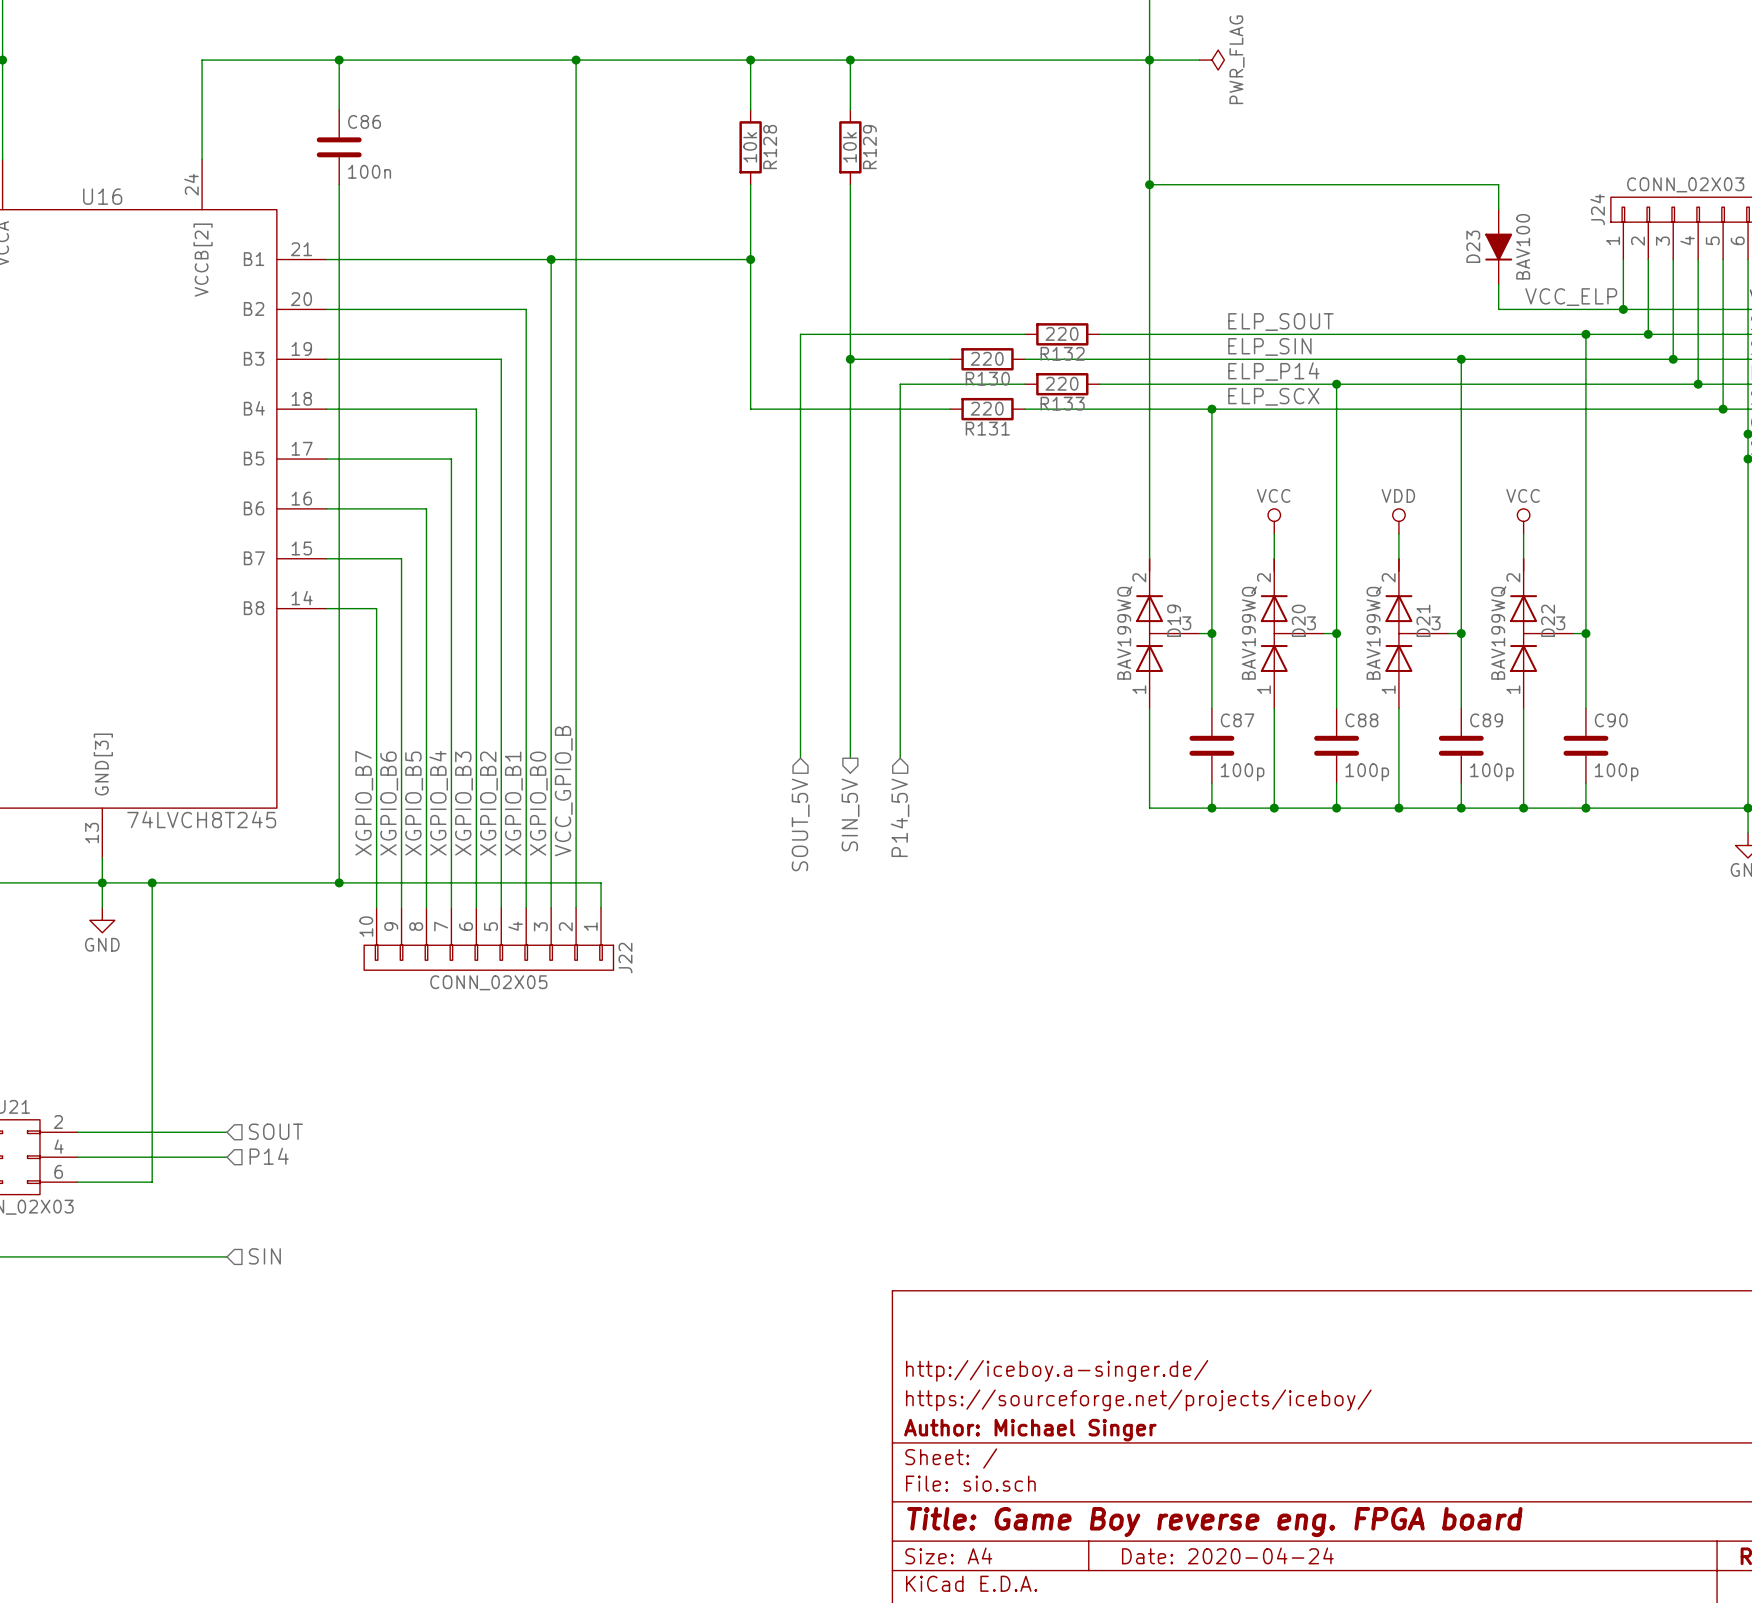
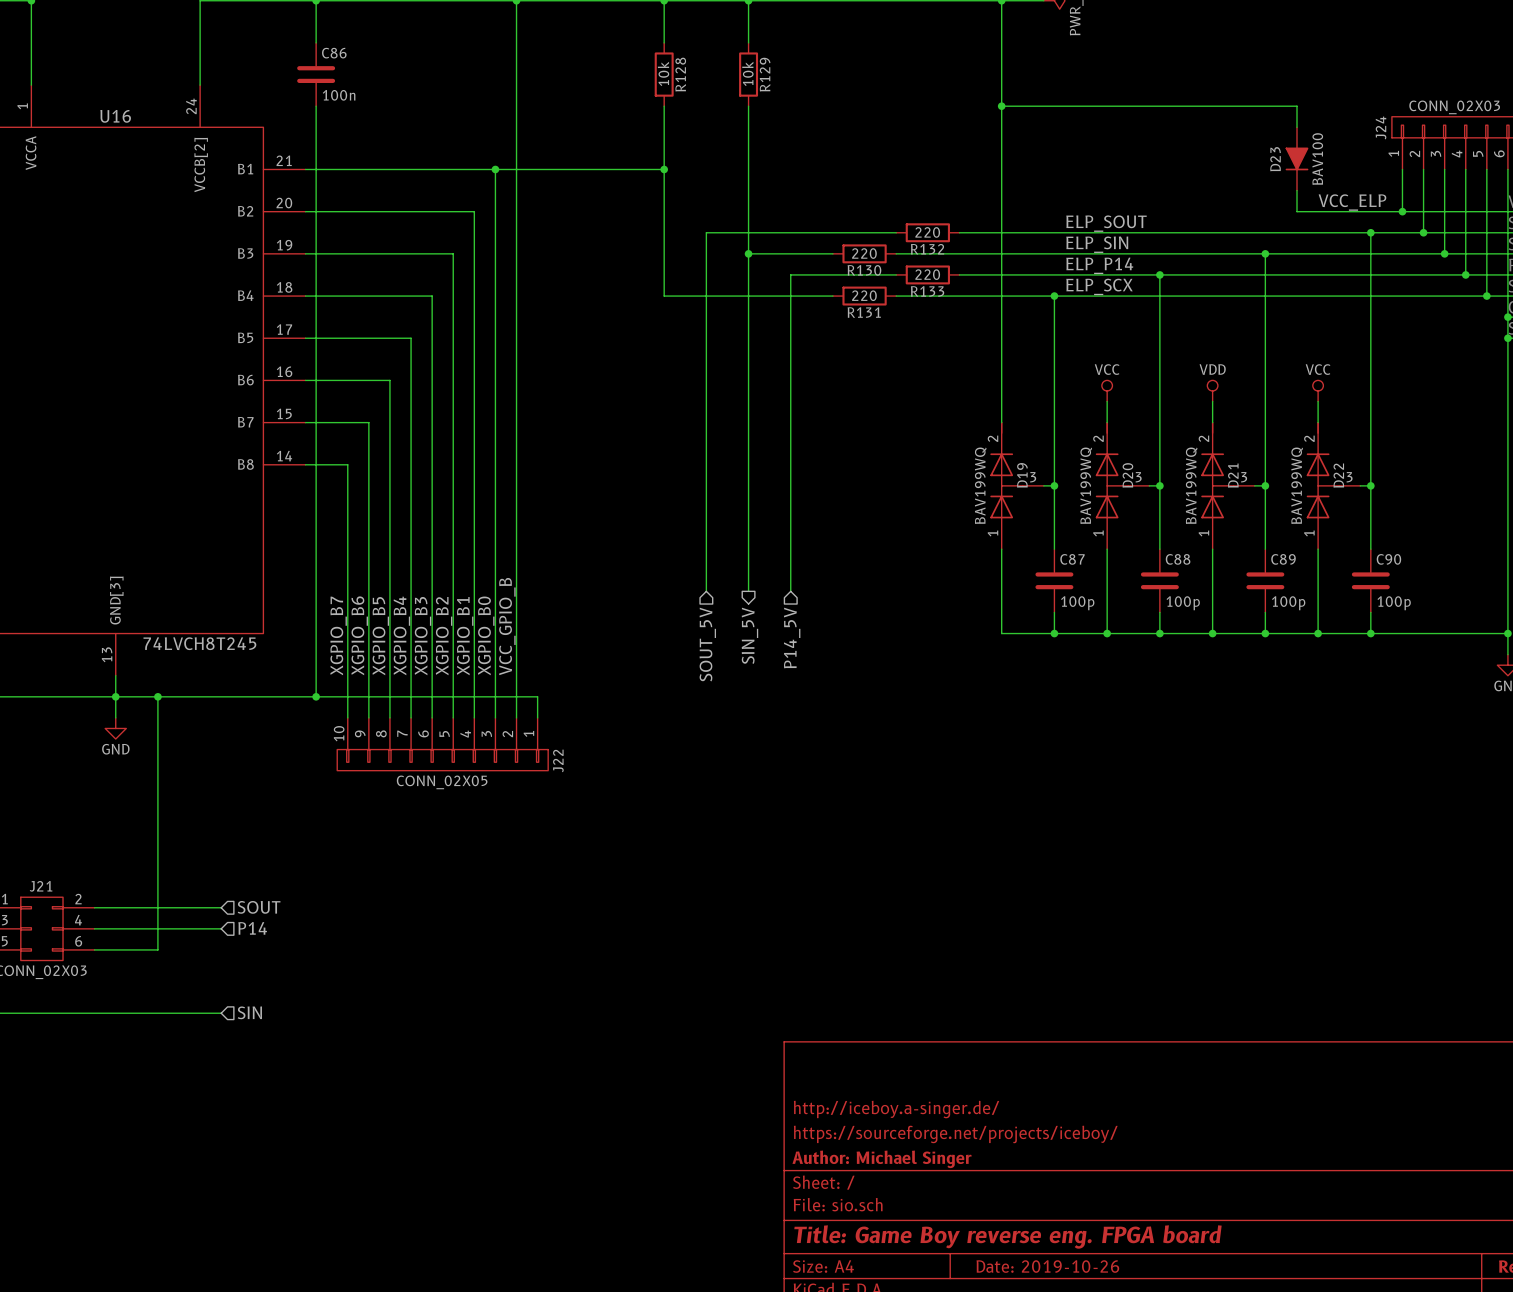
title block: Date: 2020-04-24 (1227, 1555) -> Date: 2019-10-26 (1047, 1266)

